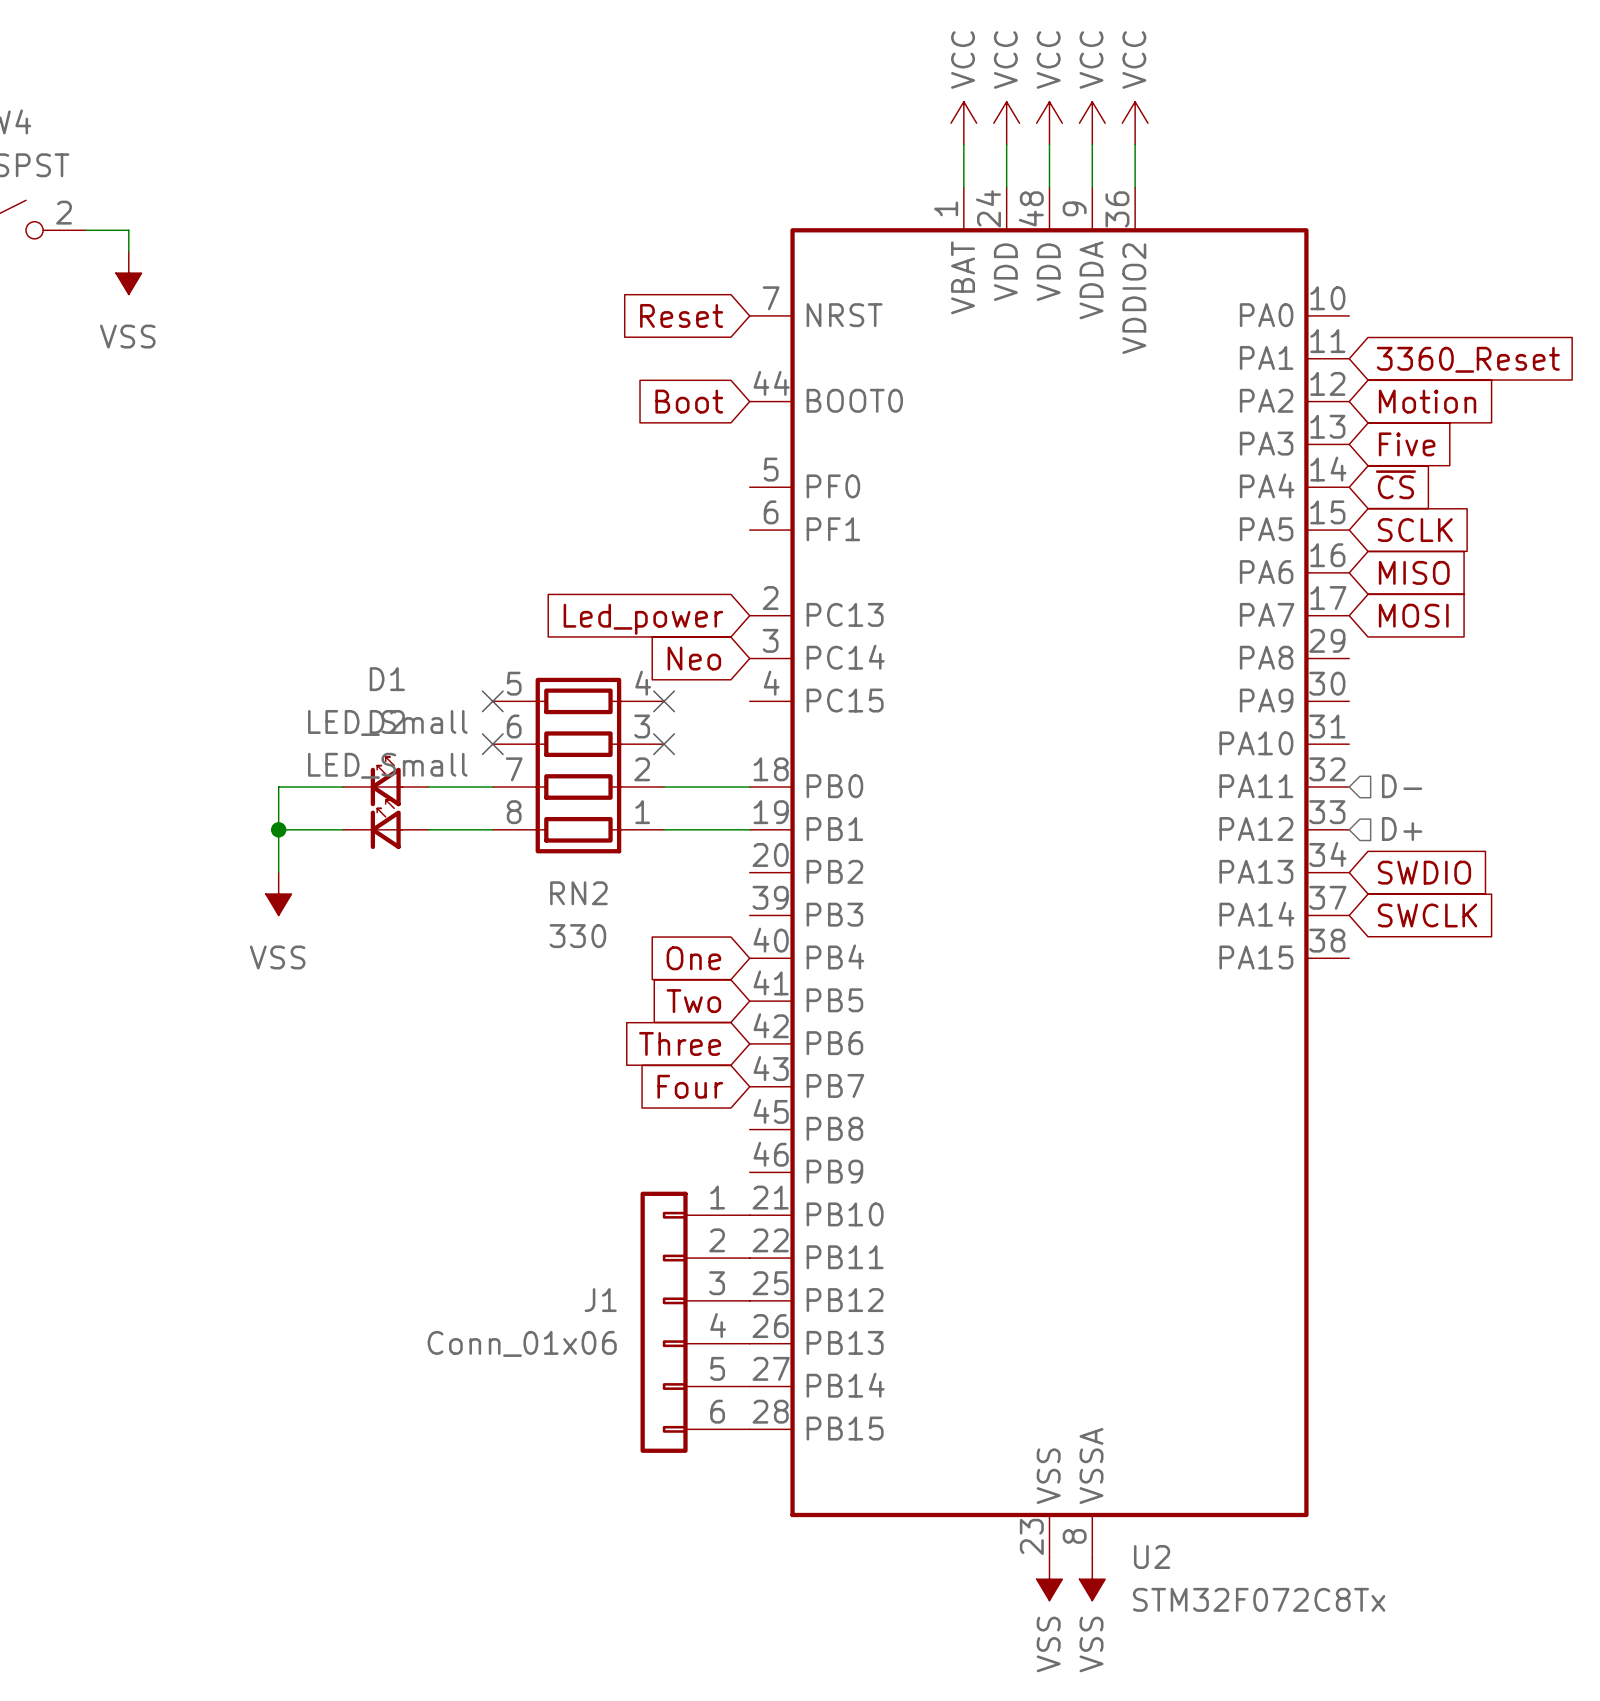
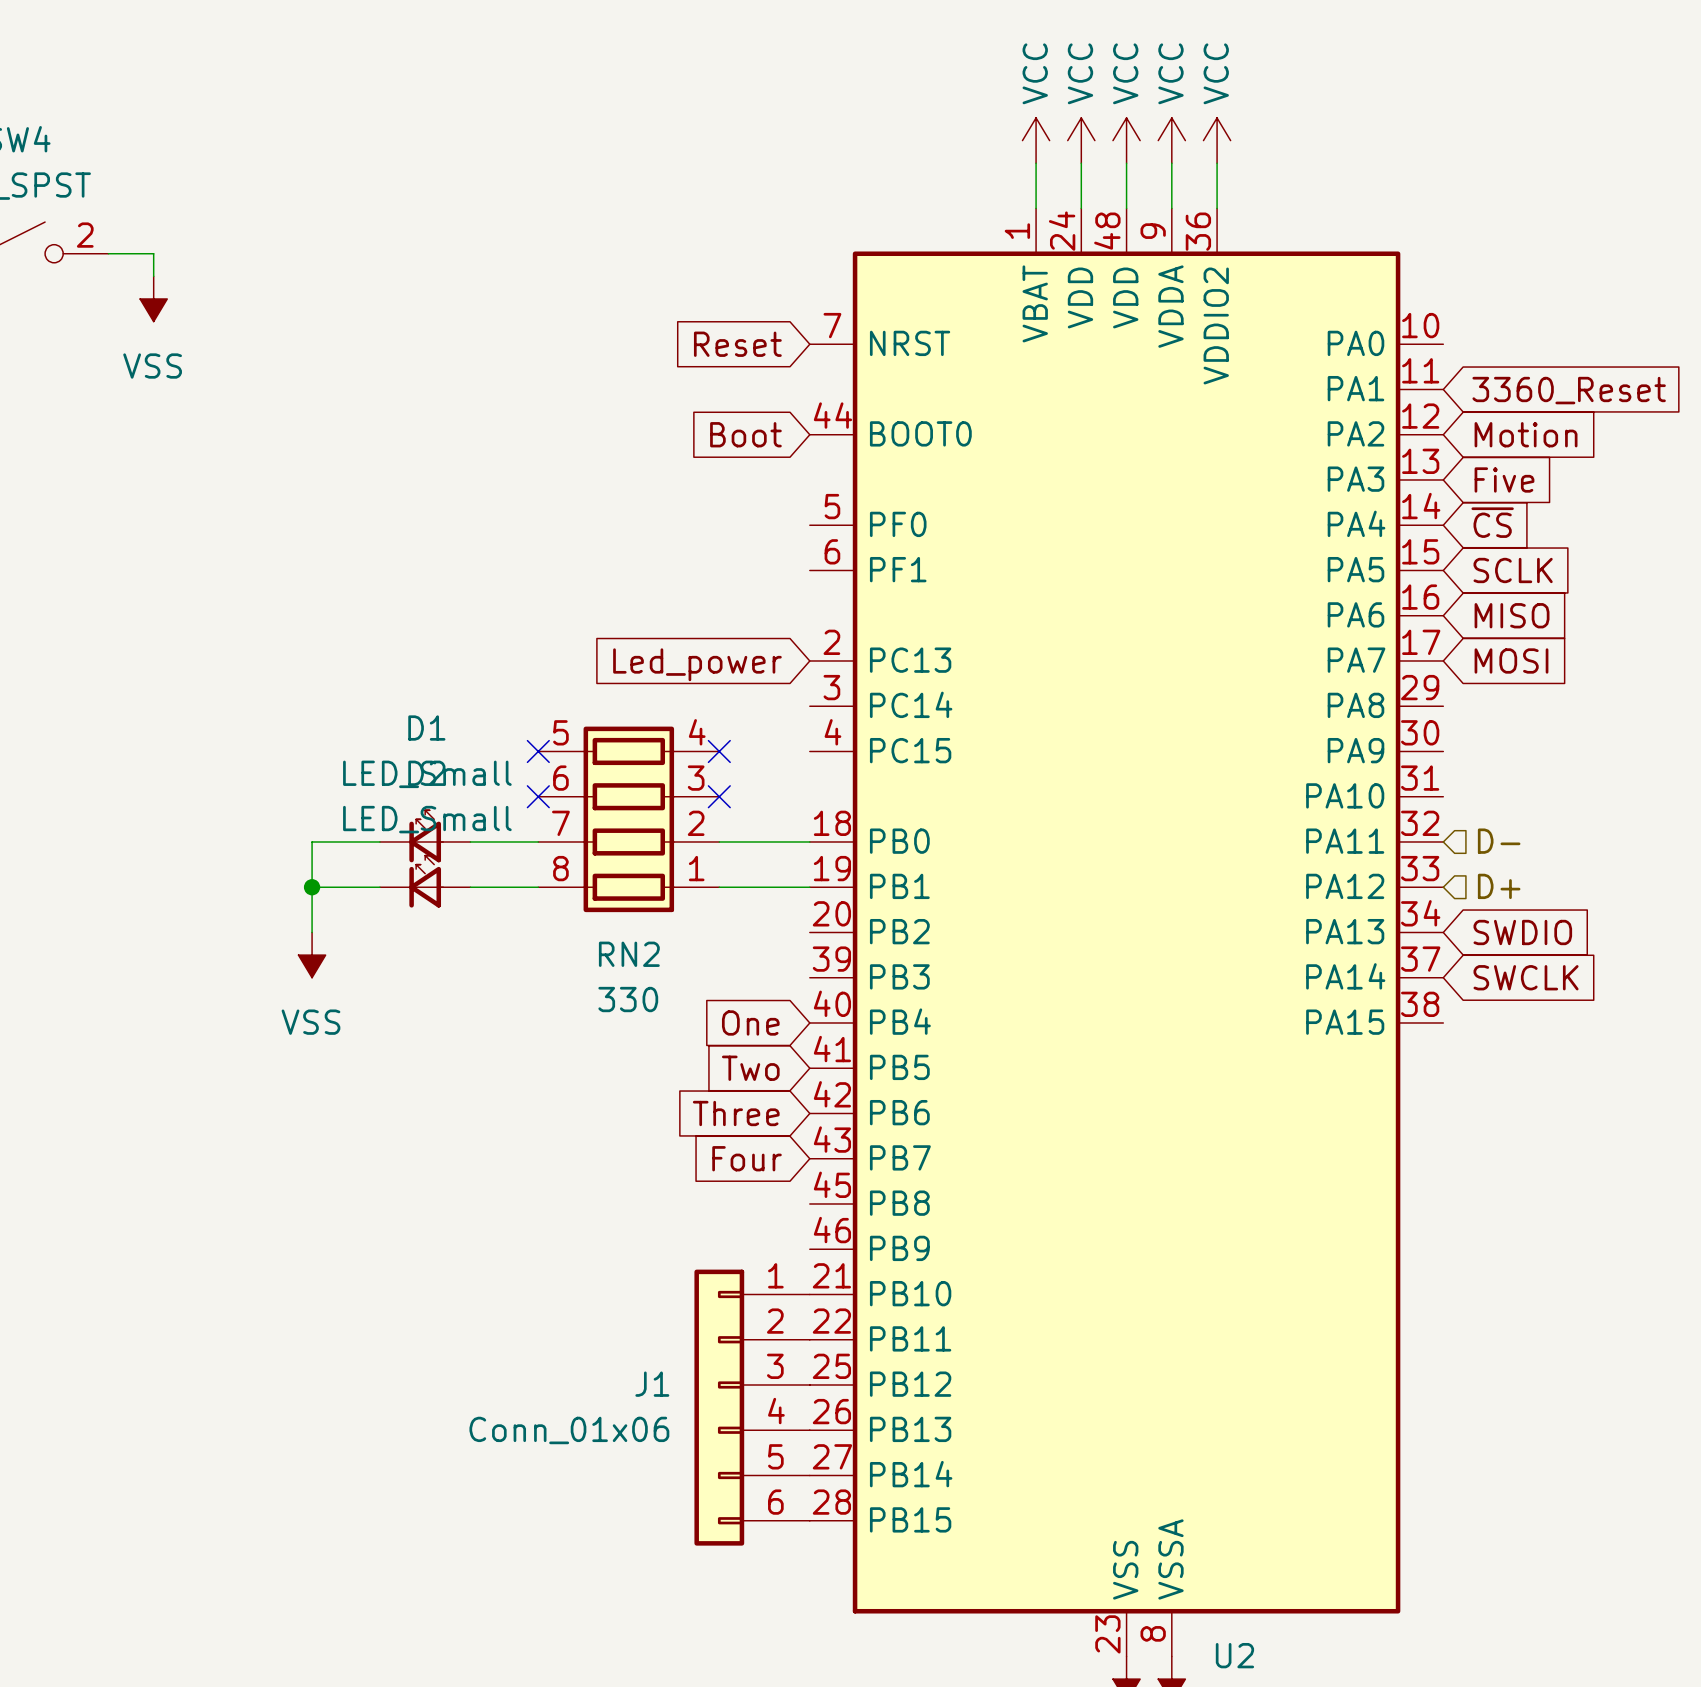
global label: Neo (694, 658) -> none

